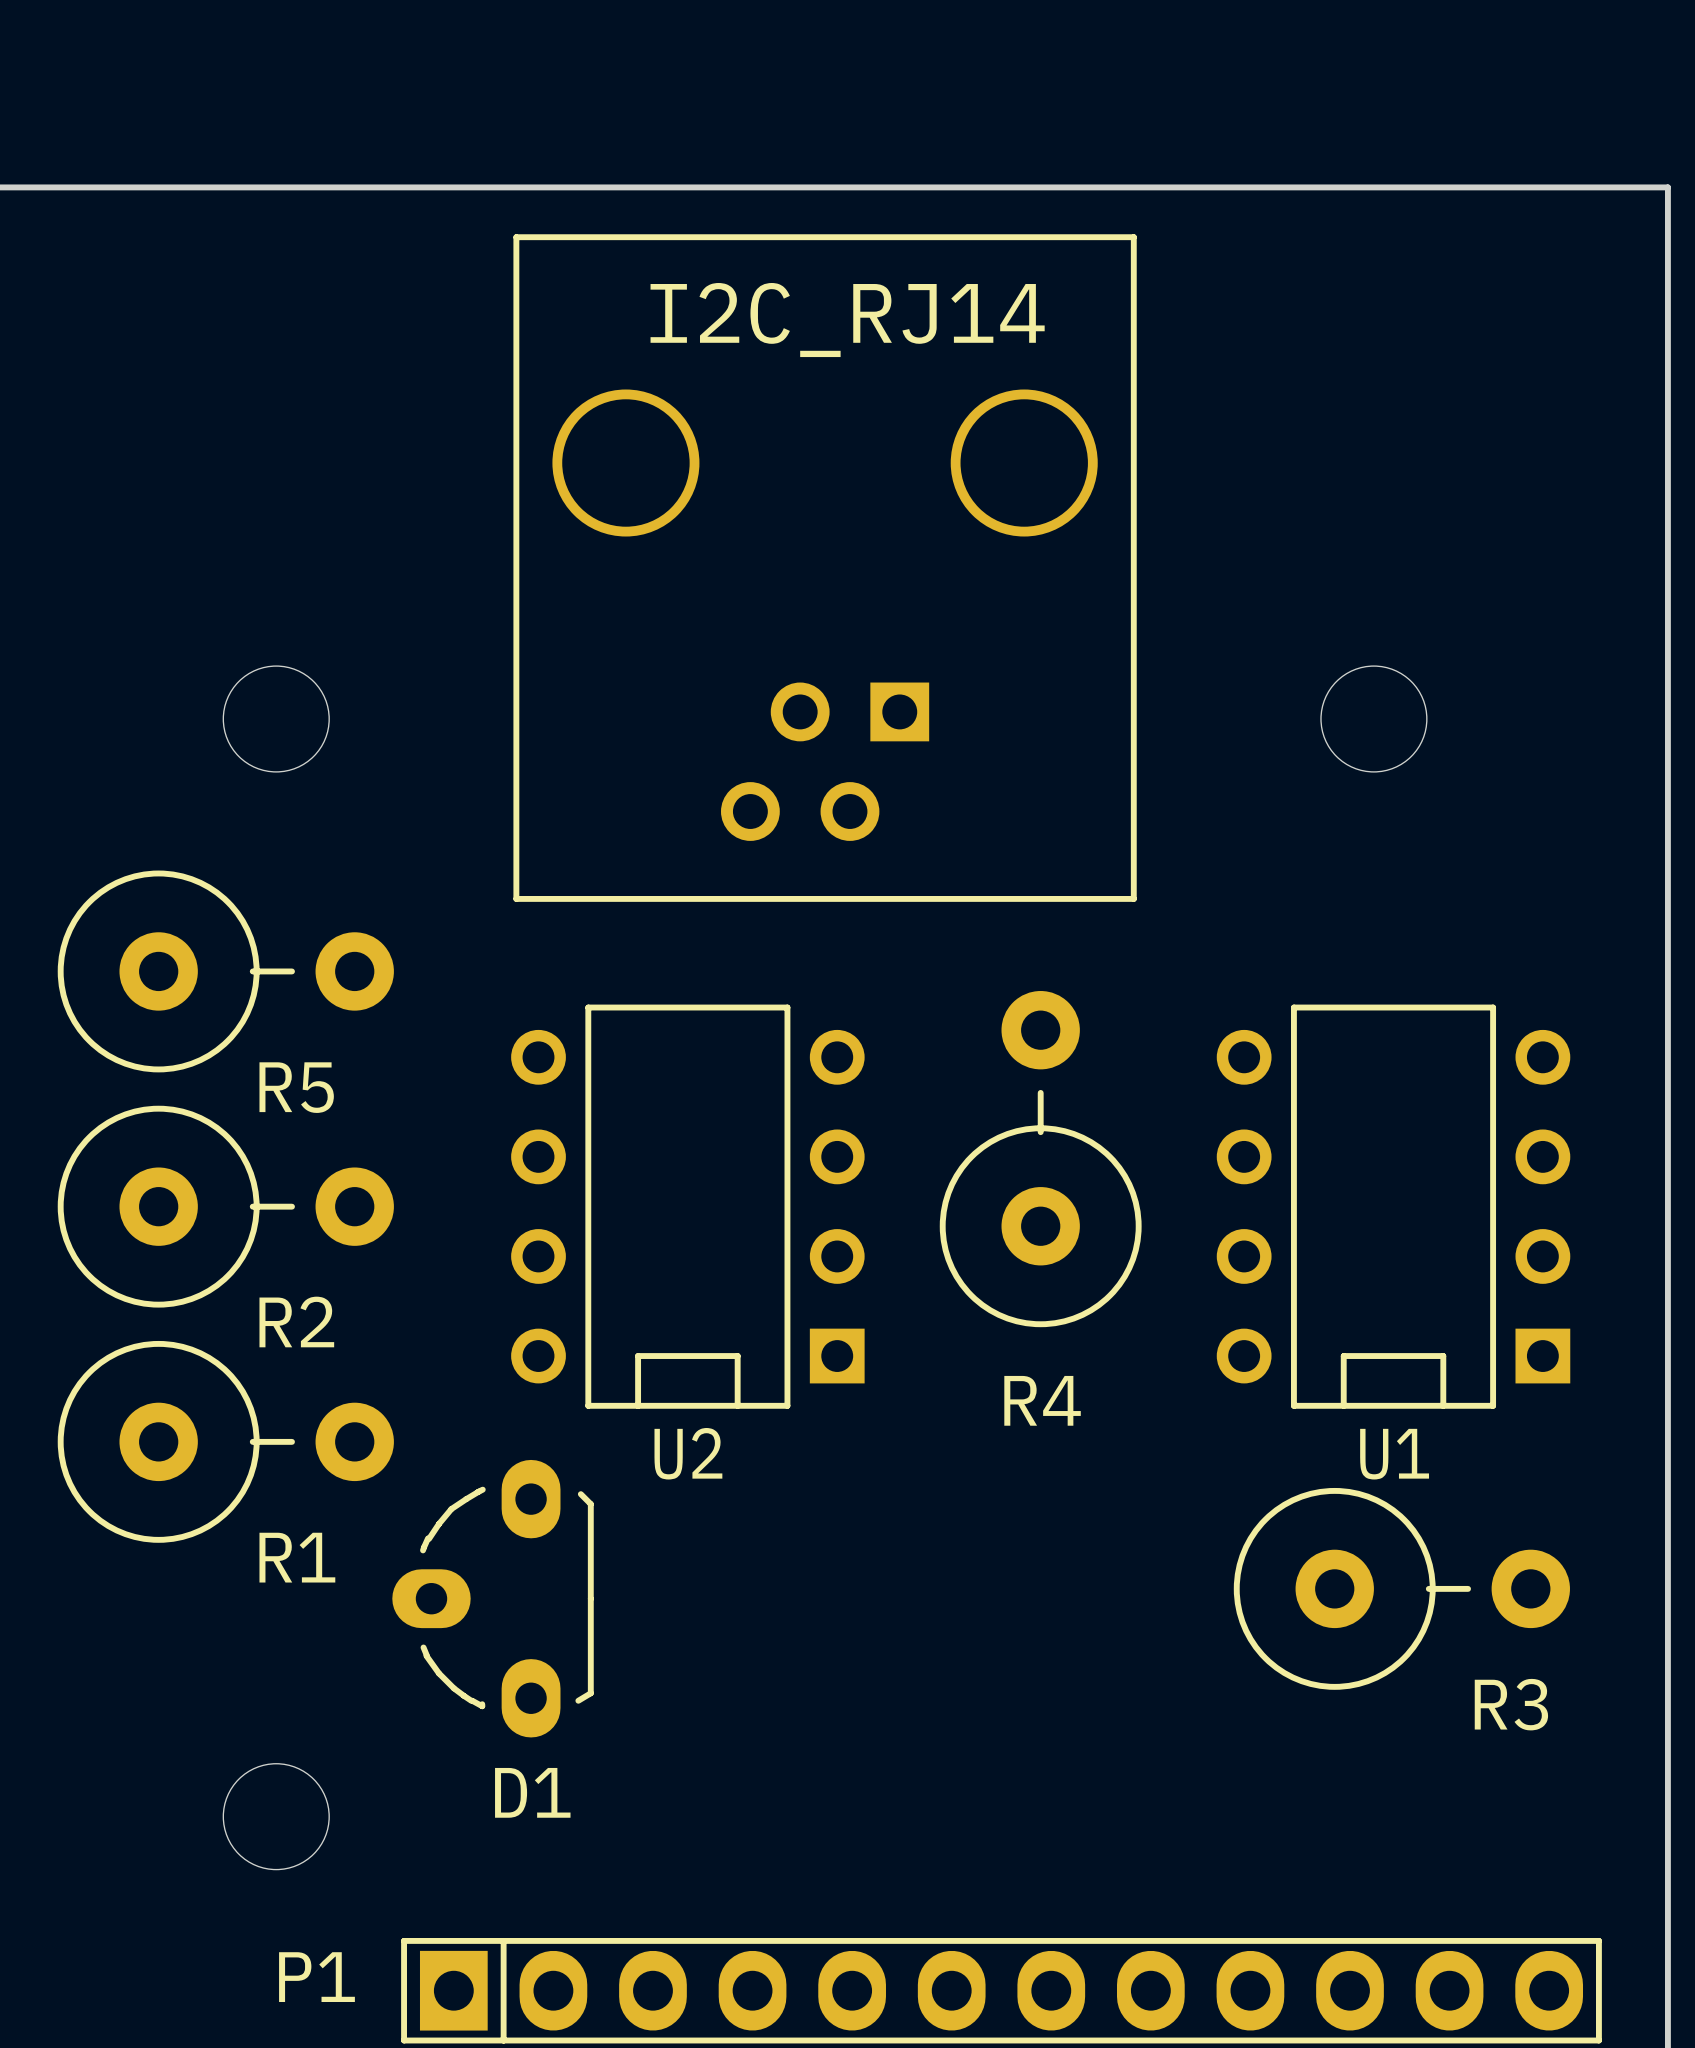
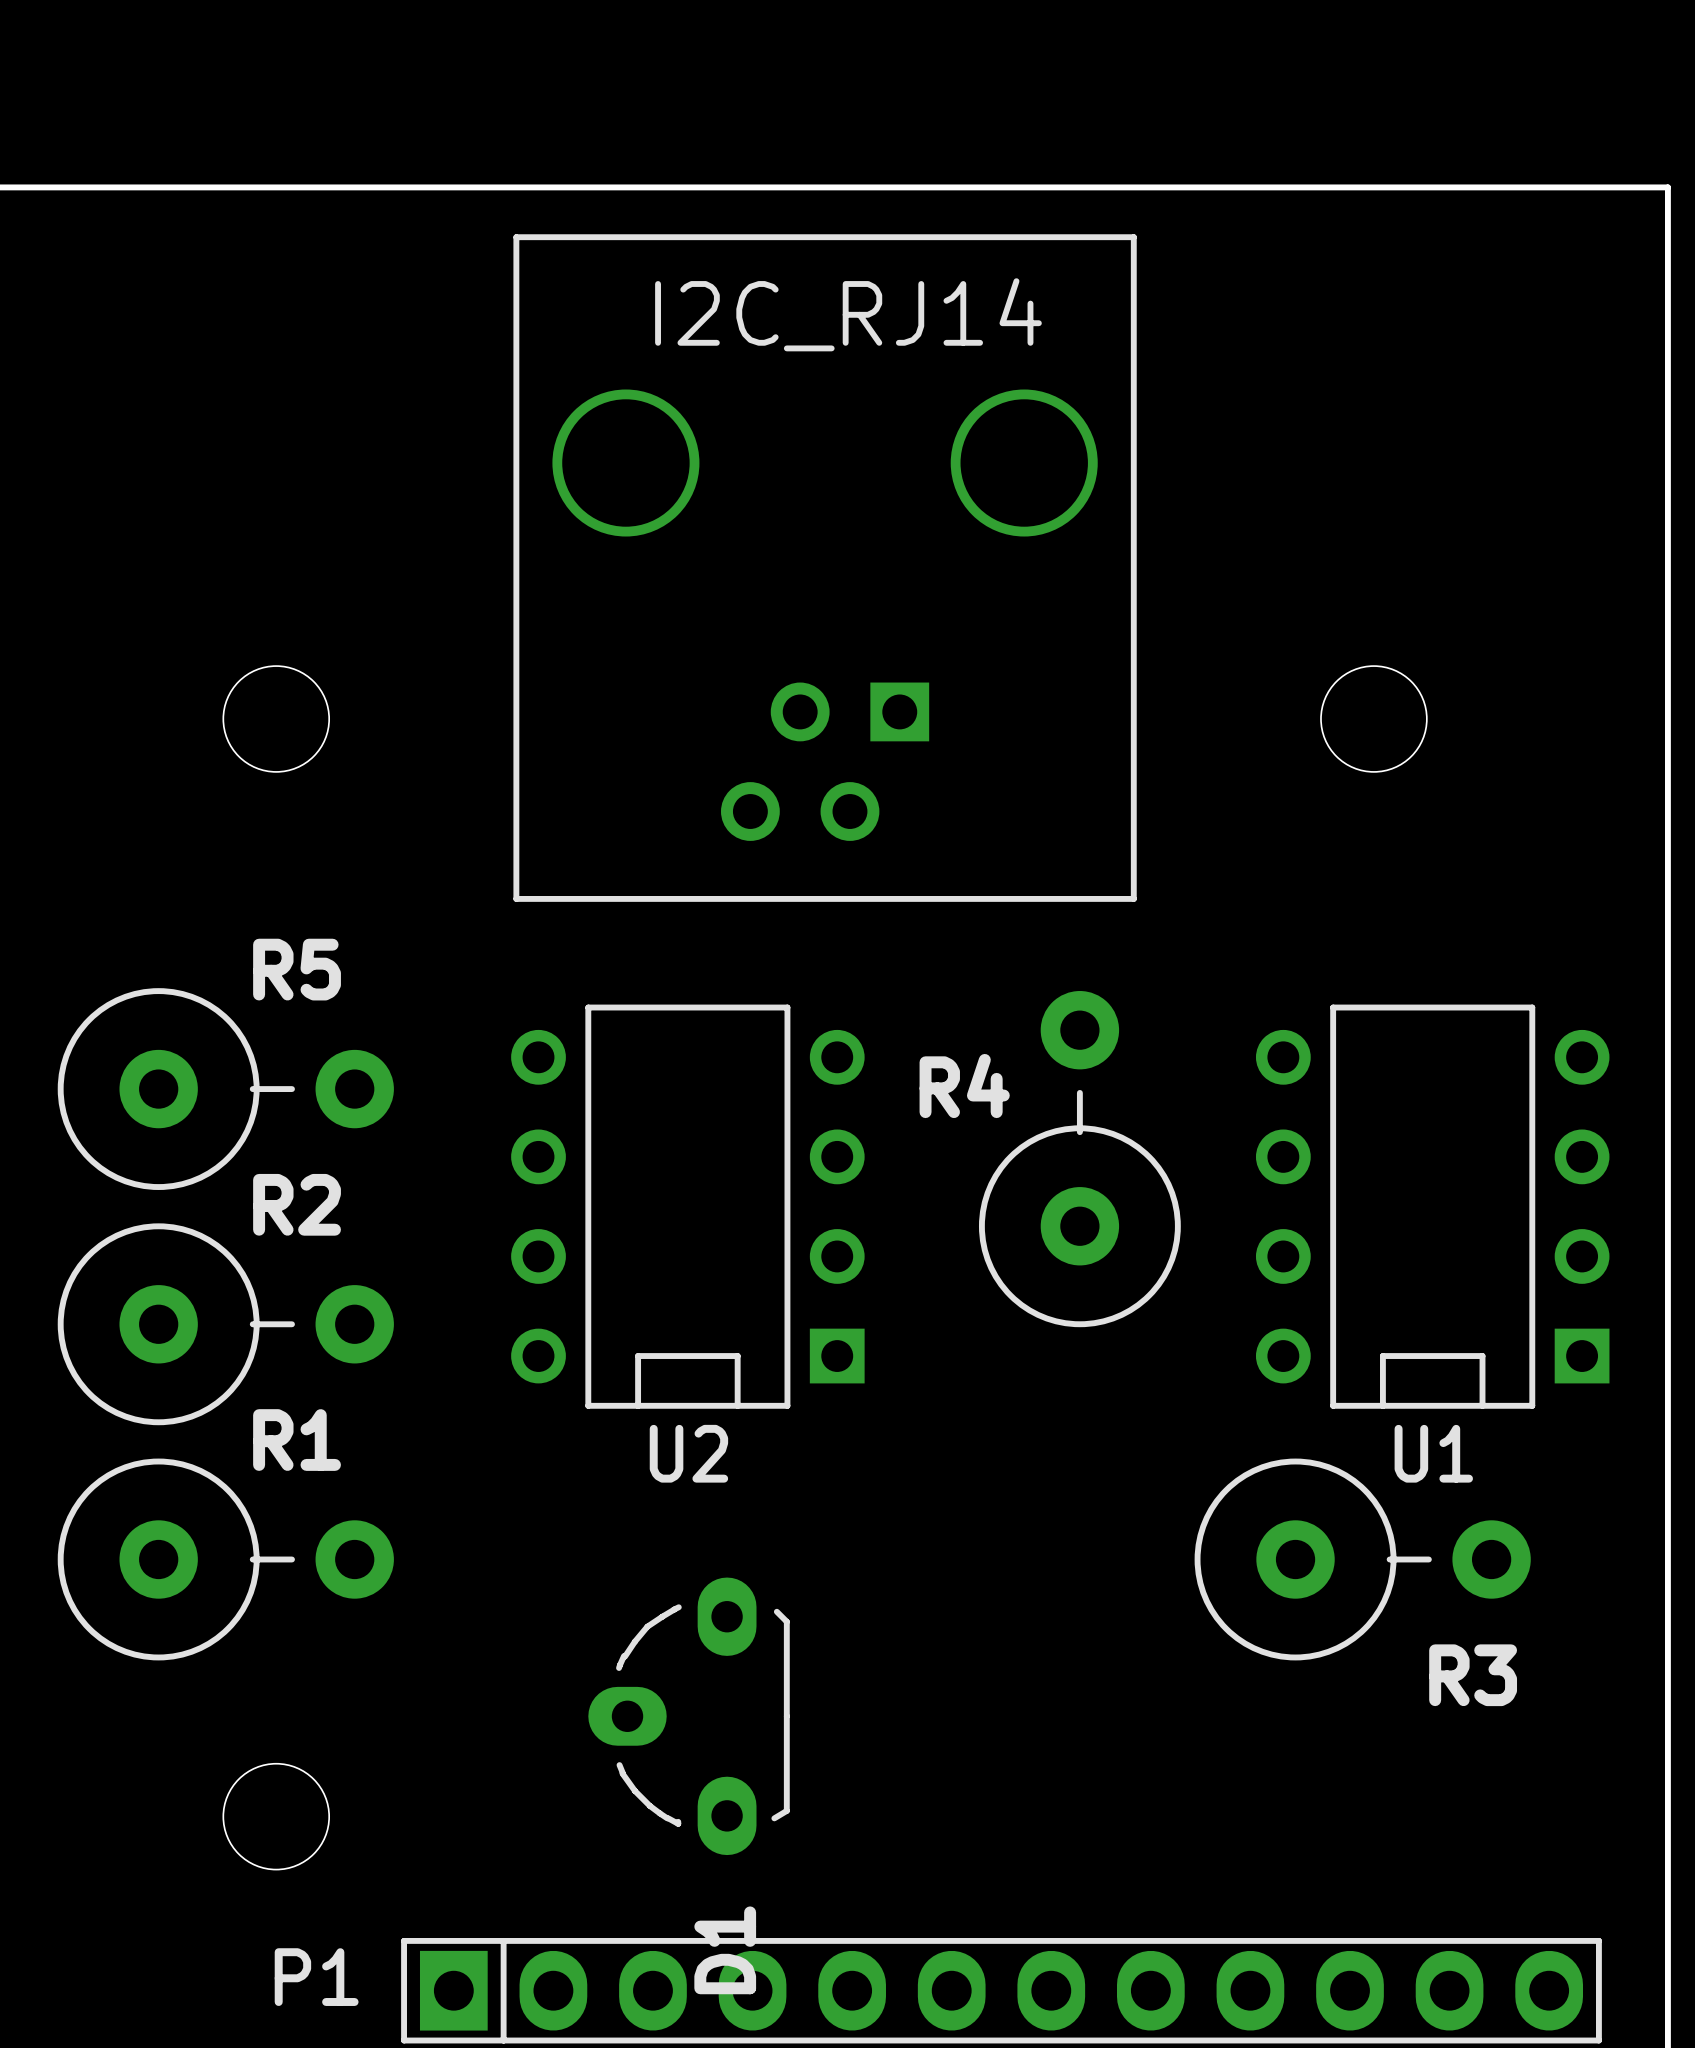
R5 position: (225, 971) -> (225, 1089)
R5 name position: R5 (296, 1087) -> R5 (297, 969)
R4 position: (1040, 1159) -> (1079, 1159)
R2 position: (225, 1206) -> (225, 1324)
U1 position: (1393, 1206) -> (1432, 1206)
R2 name position: R2 (296, 1321) -> R2 (297, 1204)
R4 name position: R4 (1042, 1400) -> R4 (964, 1086)
R1 position: (225, 1441) -> (225, 1559)
R1 name position: R1 (297, 1557) -> R1 (297, 1440)
R3 position: (1401, 1588) -> (1362, 1559)
D1 position: (493, 1598) -> (689, 1716)
D1 name rotation: 0° (532, 1792) -> 90° counterclockwise (725, 1950)

